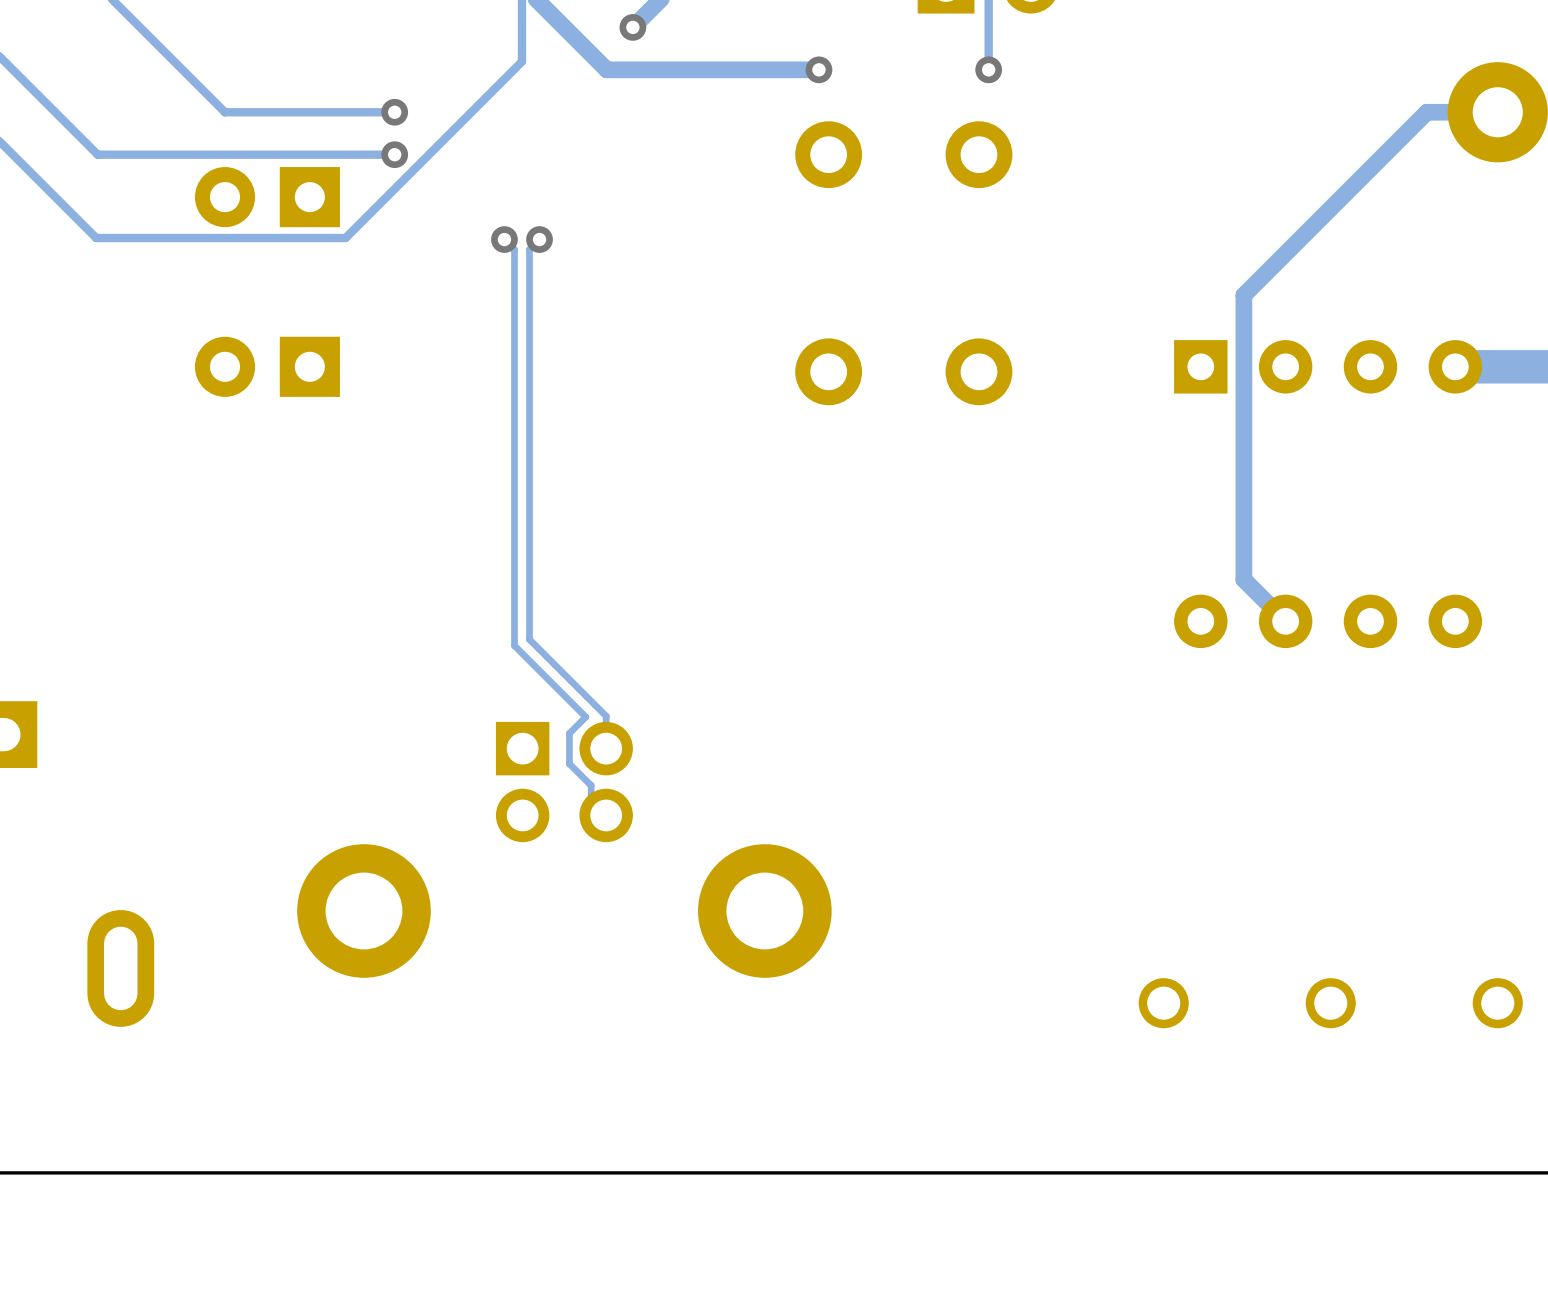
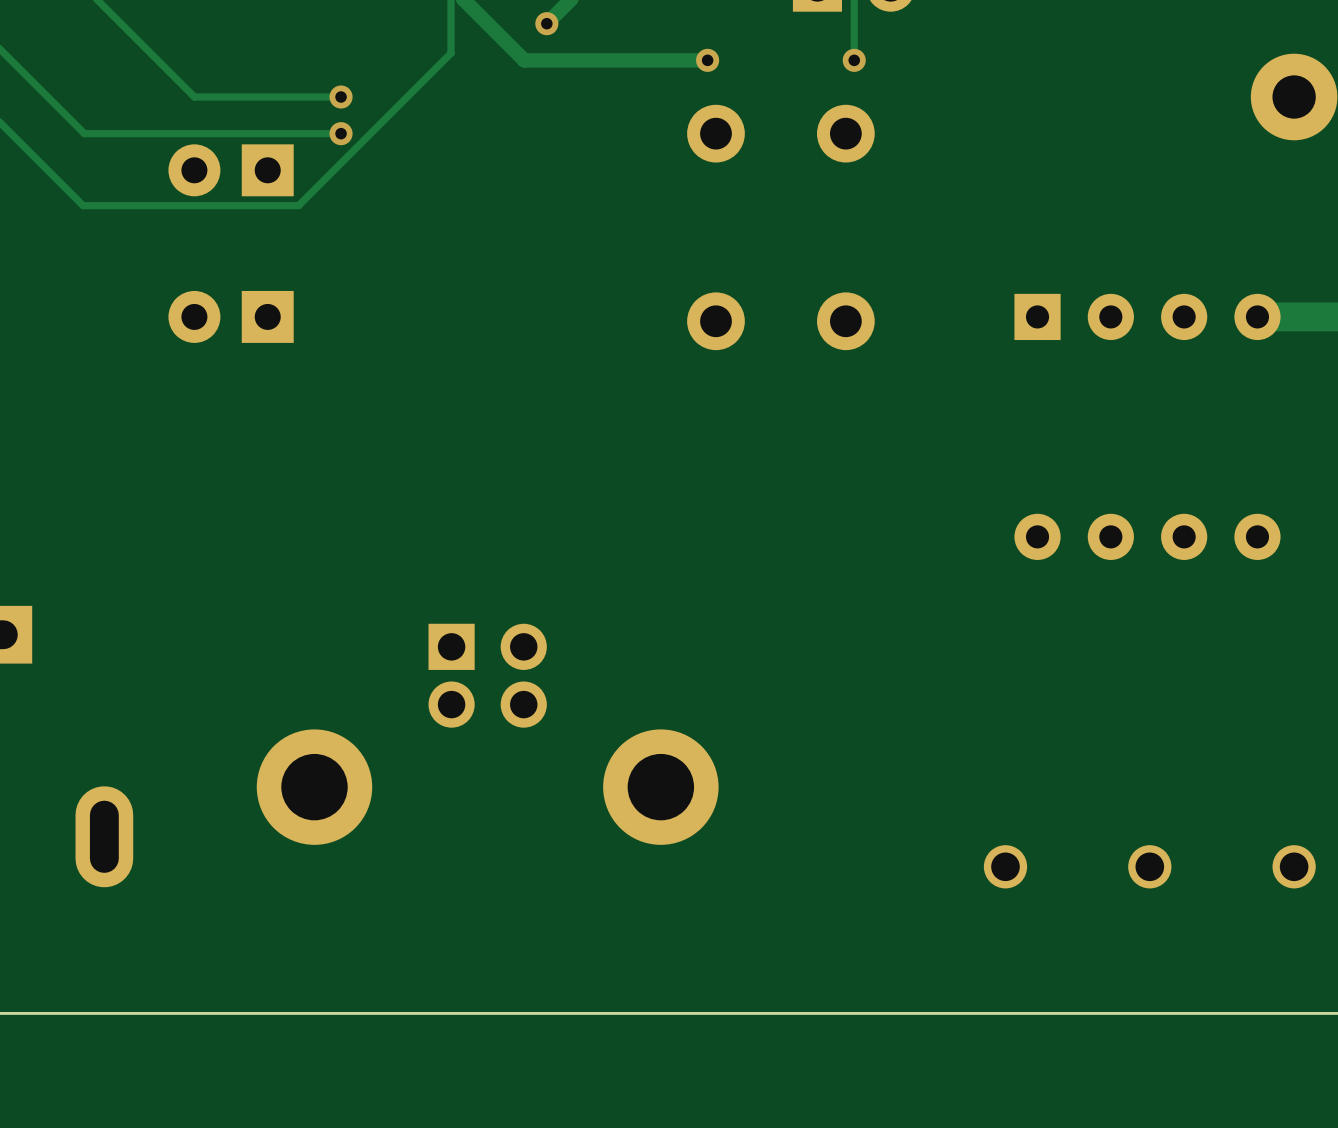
track: (1497, 112) (1426, 112) (1243, 295) (1243, 579) (1285, 621) -> none
track: (504, 239) (514, 249) (514, 645) (585, 717) (569, 733) (569, 763) (591, 785) (591, 800) (606, 815) -> none
via: (504, 239) -> none
track: (539, 239) (529, 249) (529, 639) (606, 716) (606, 748) -> none
via: (539, 239) -> none

